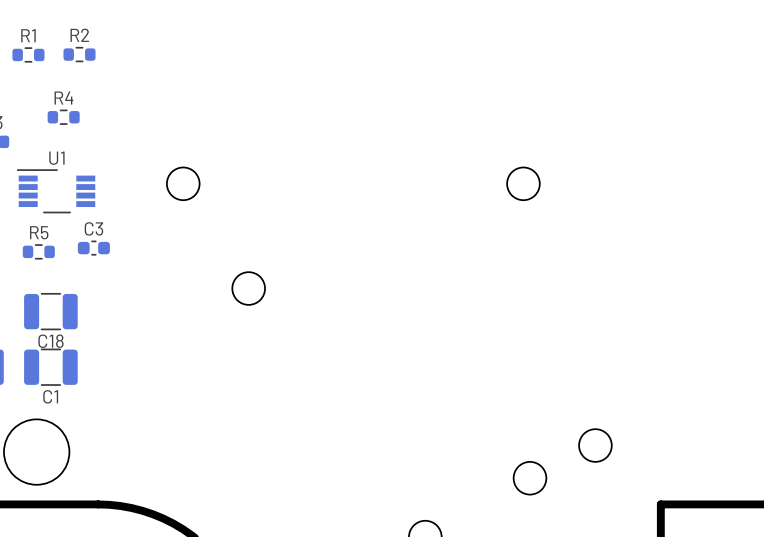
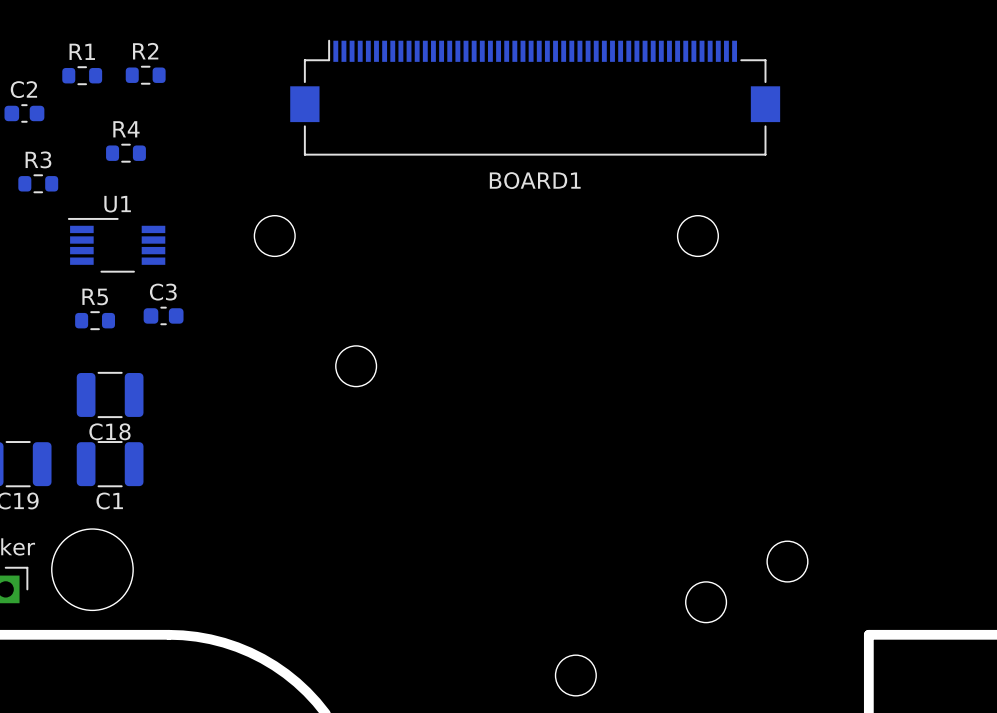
BOARD1: none -> (535, 97)

